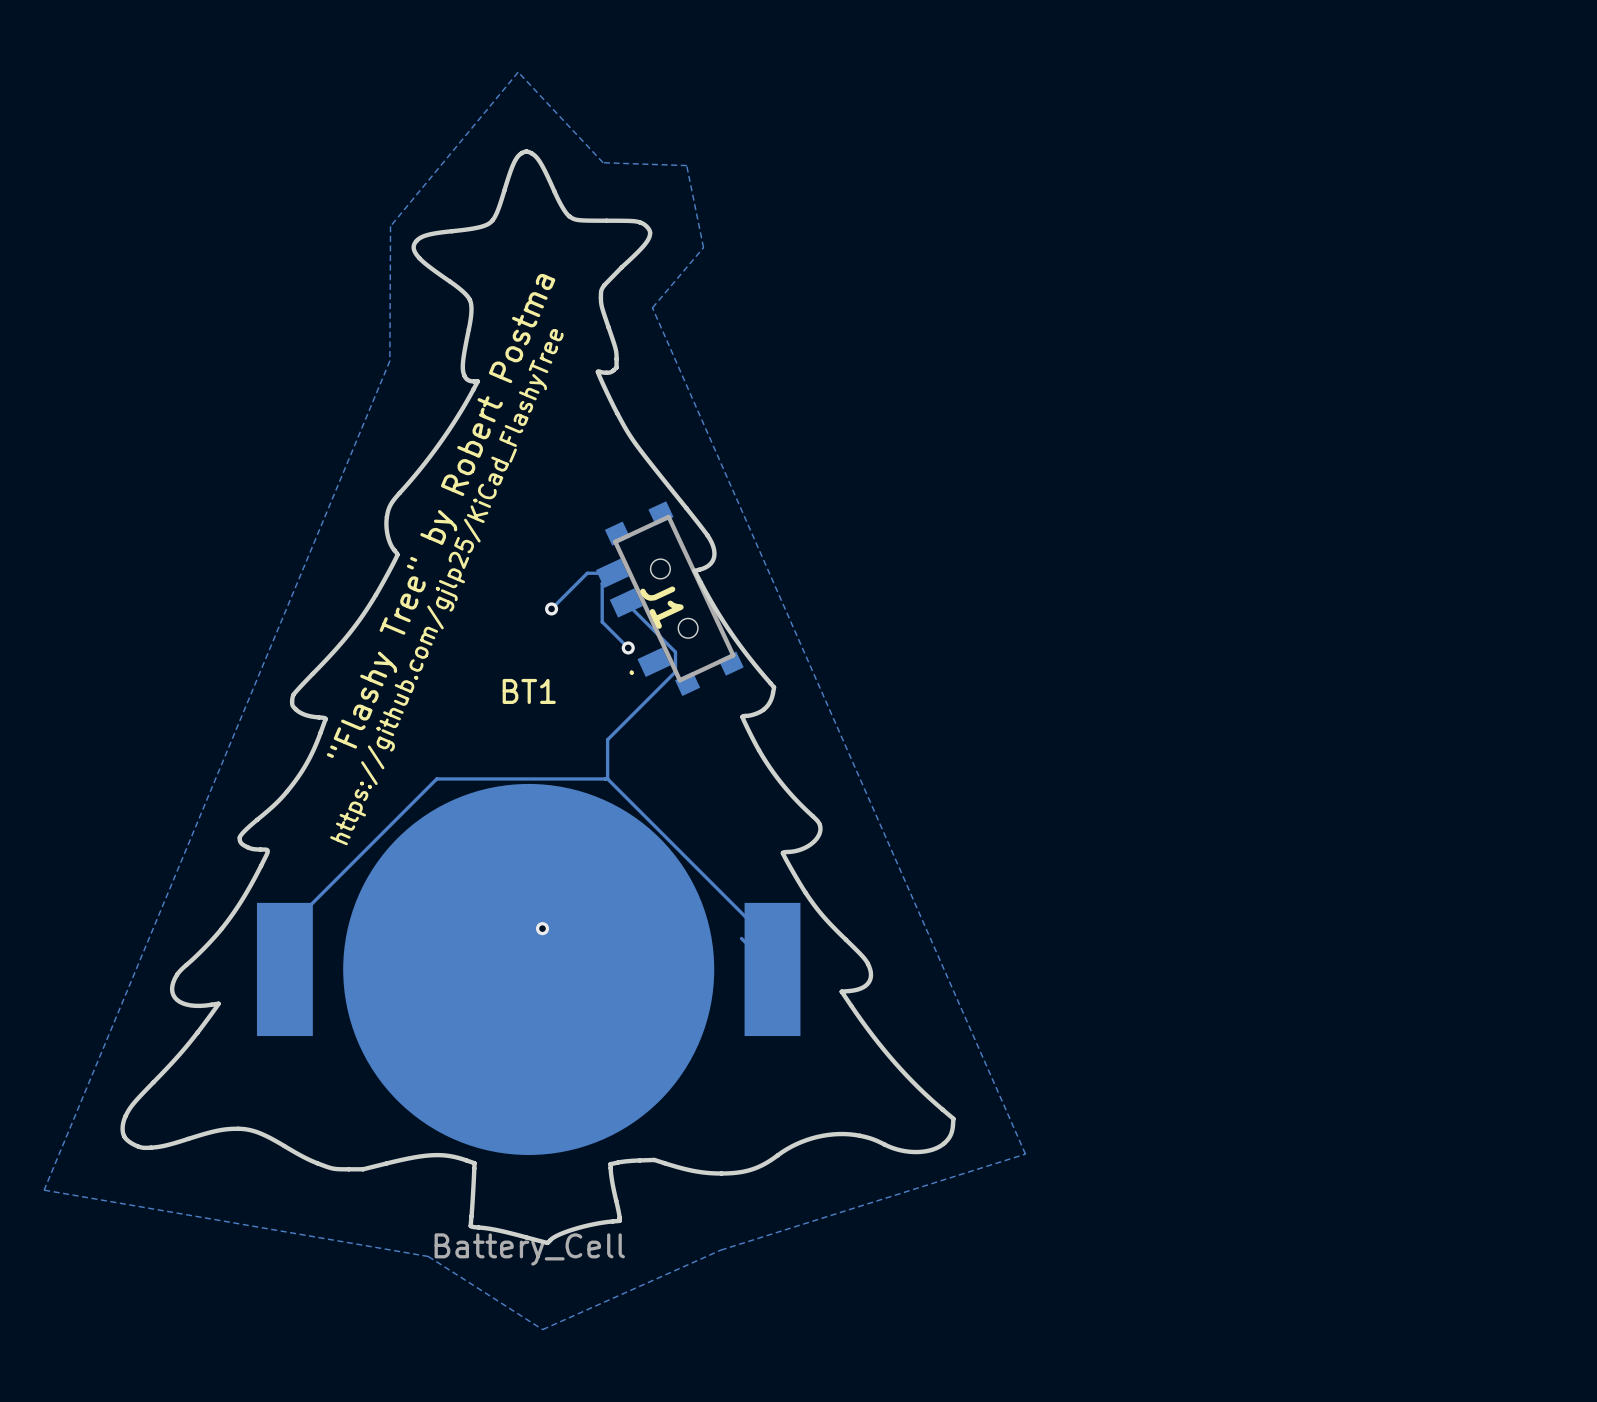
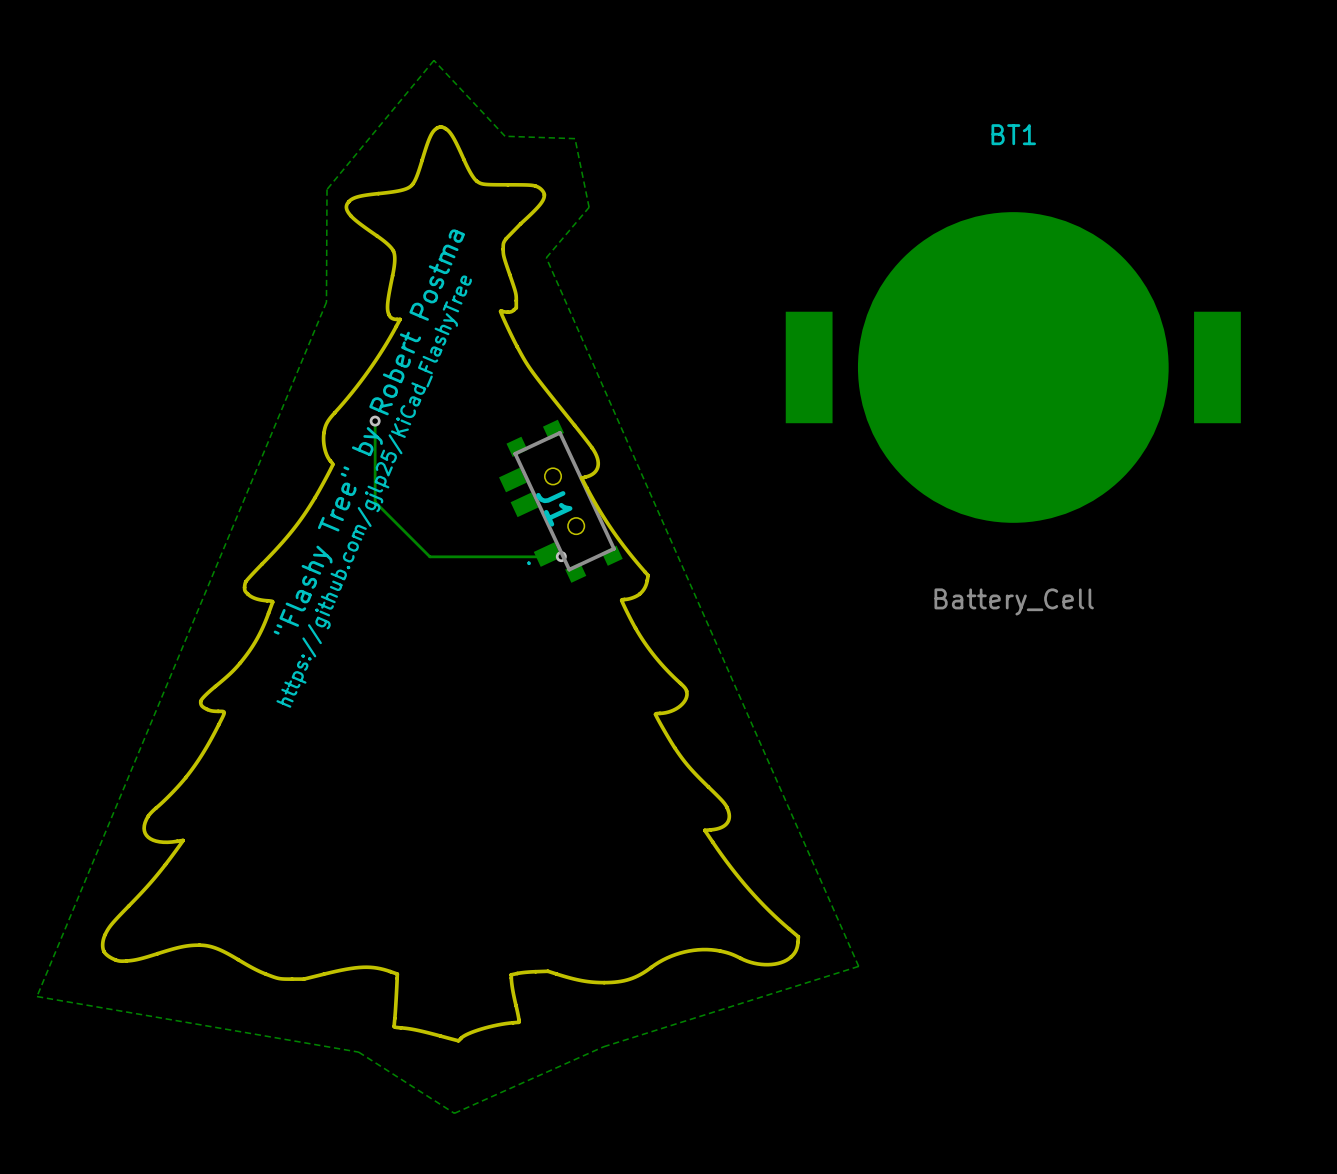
track: none -> (375, 421) (375, 502) (429, 556) (561, 556)
via: none -> (375, 421)
track: (626, 602) (675, 652) (675, 671) (607, 739) (607, 778) -> none
track: (551, 608) (587, 573) (612, 573) (602, 583) (602, 621) (628, 647) -> none
via: (551, 608) -> none
via position: (628, 647) -> (561, 556)
track: (607, 778) (436, 778) (284, 930) (284, 969) -> none
track: (607, 778) (772, 943) (772, 969) (741, 938) -> none
via: (542, 928) -> none
BT1 position: (528, 969) -> (1013, 367)

